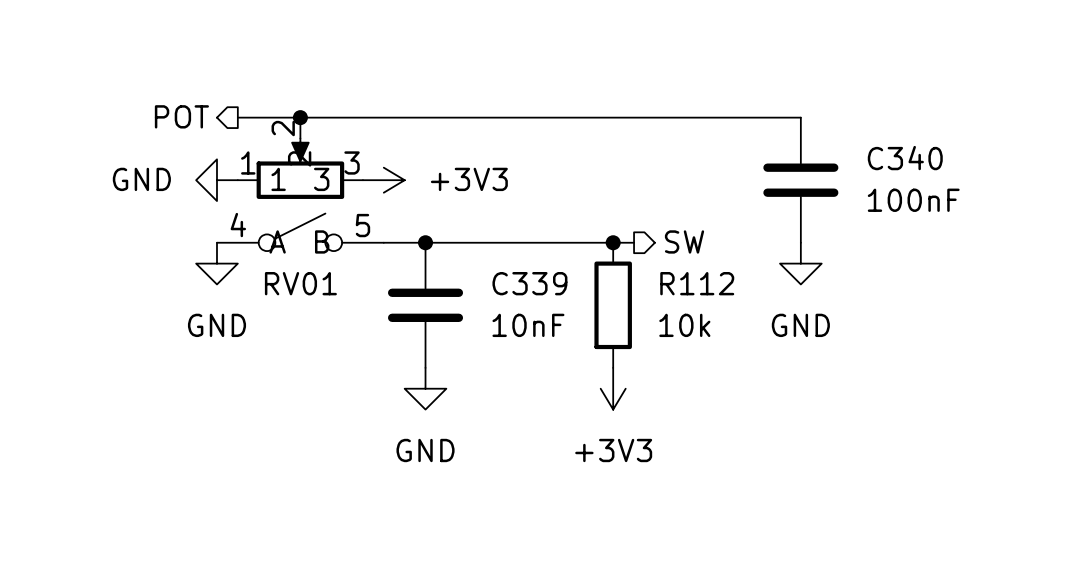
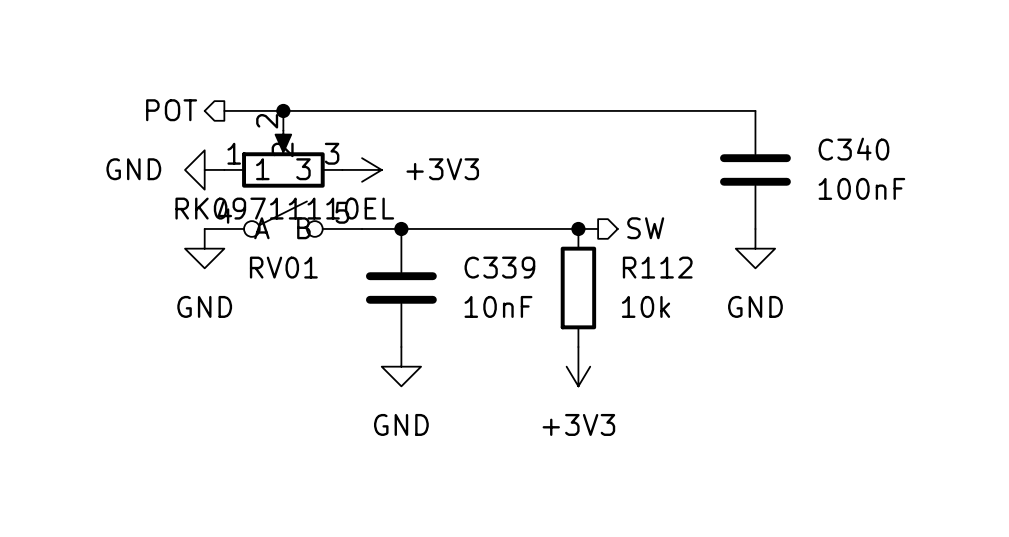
RV01 text: none -> RK09711110EL (284, 208)

